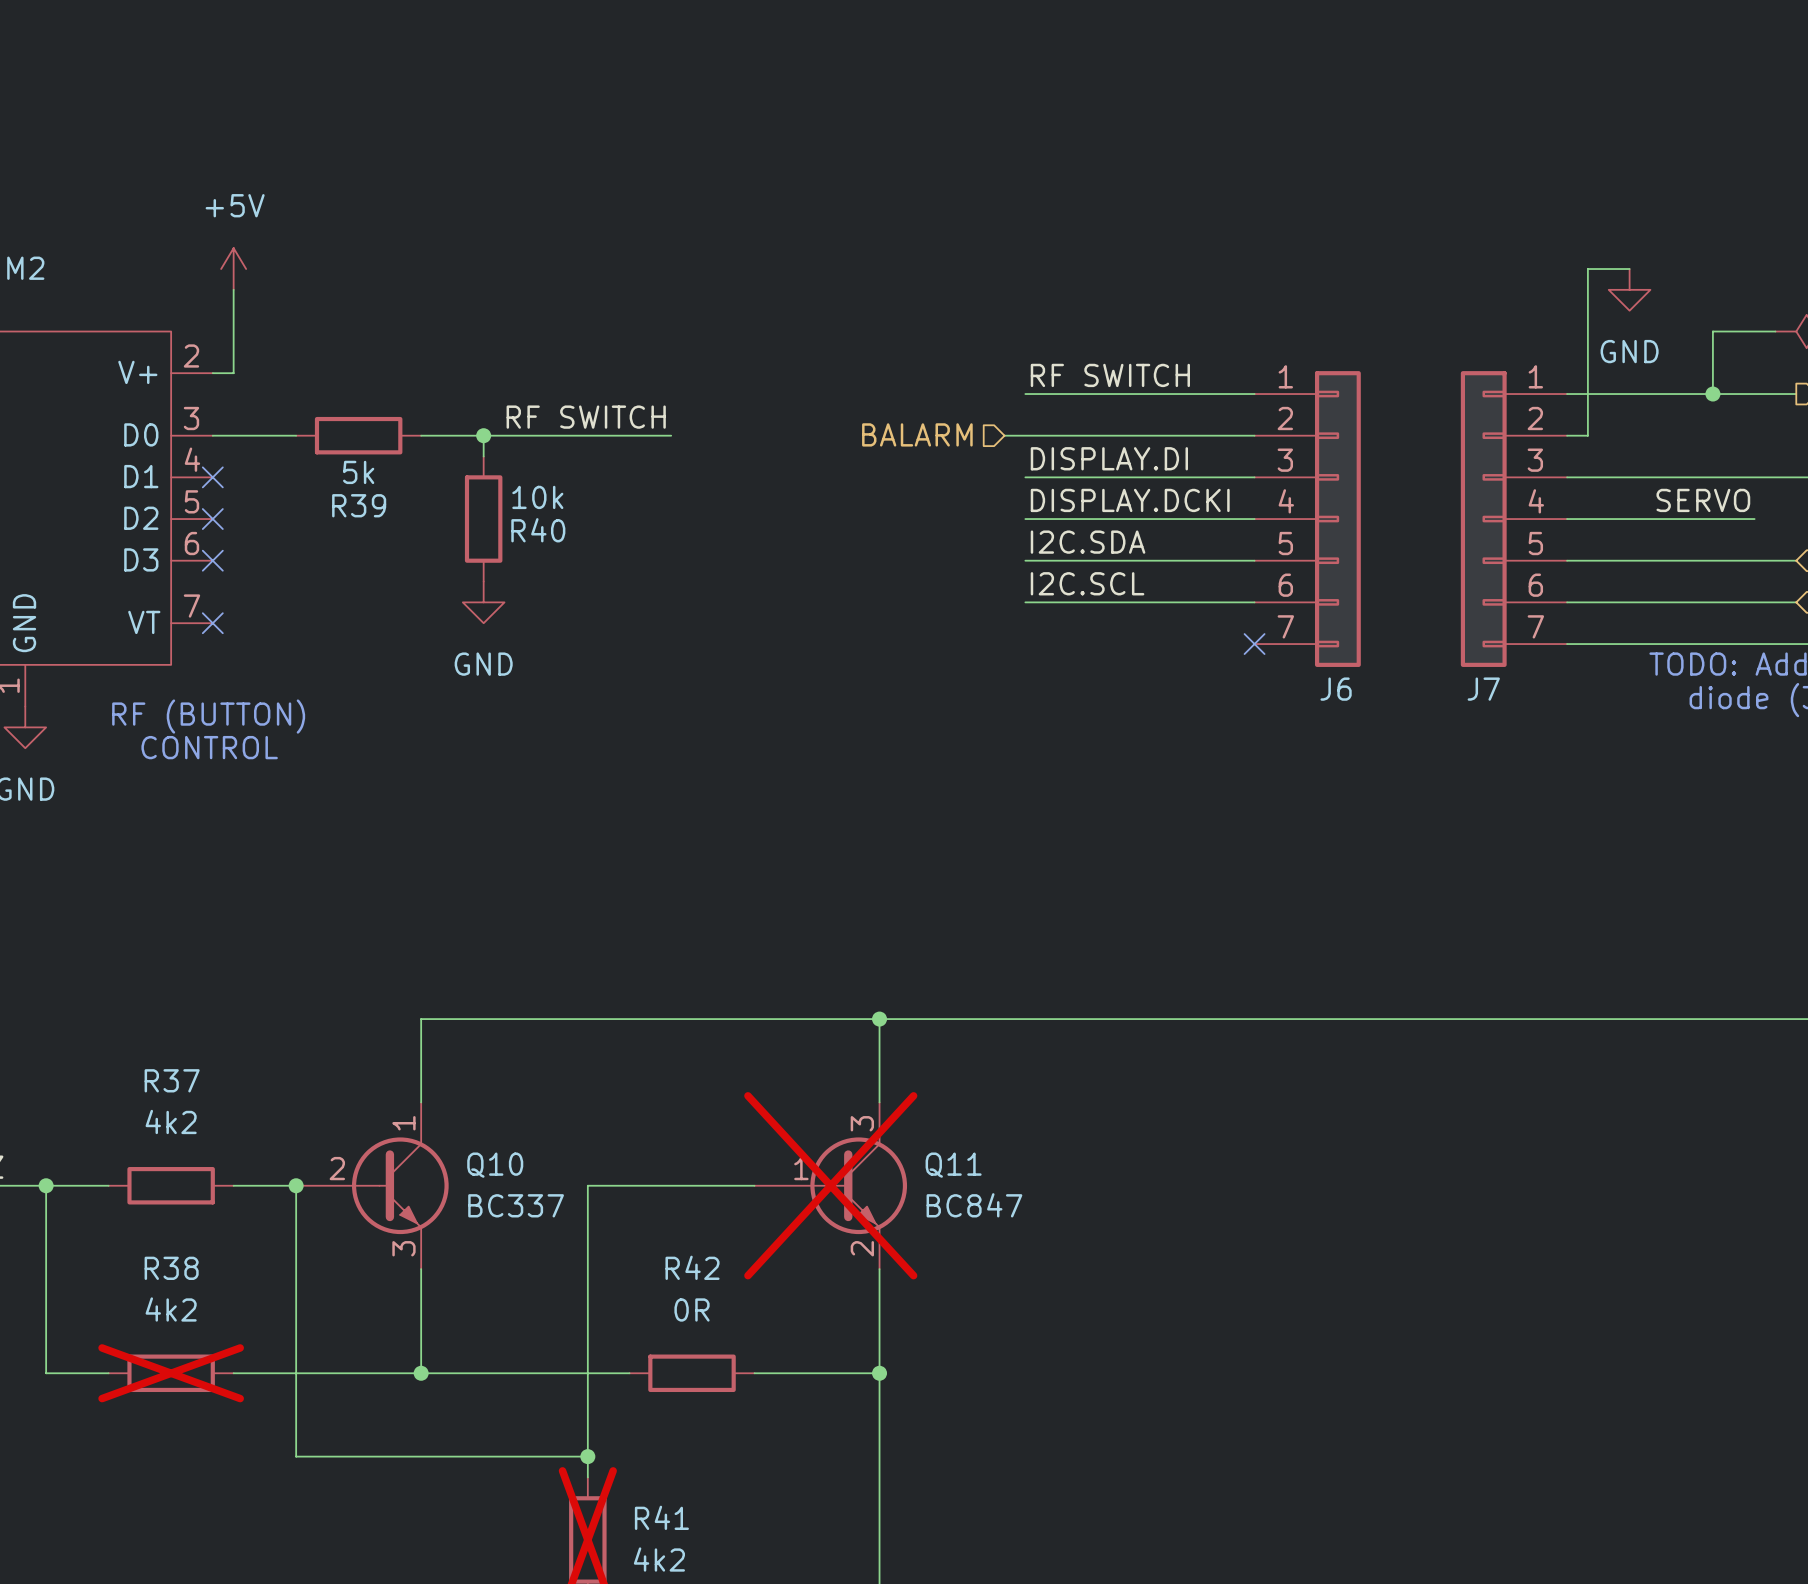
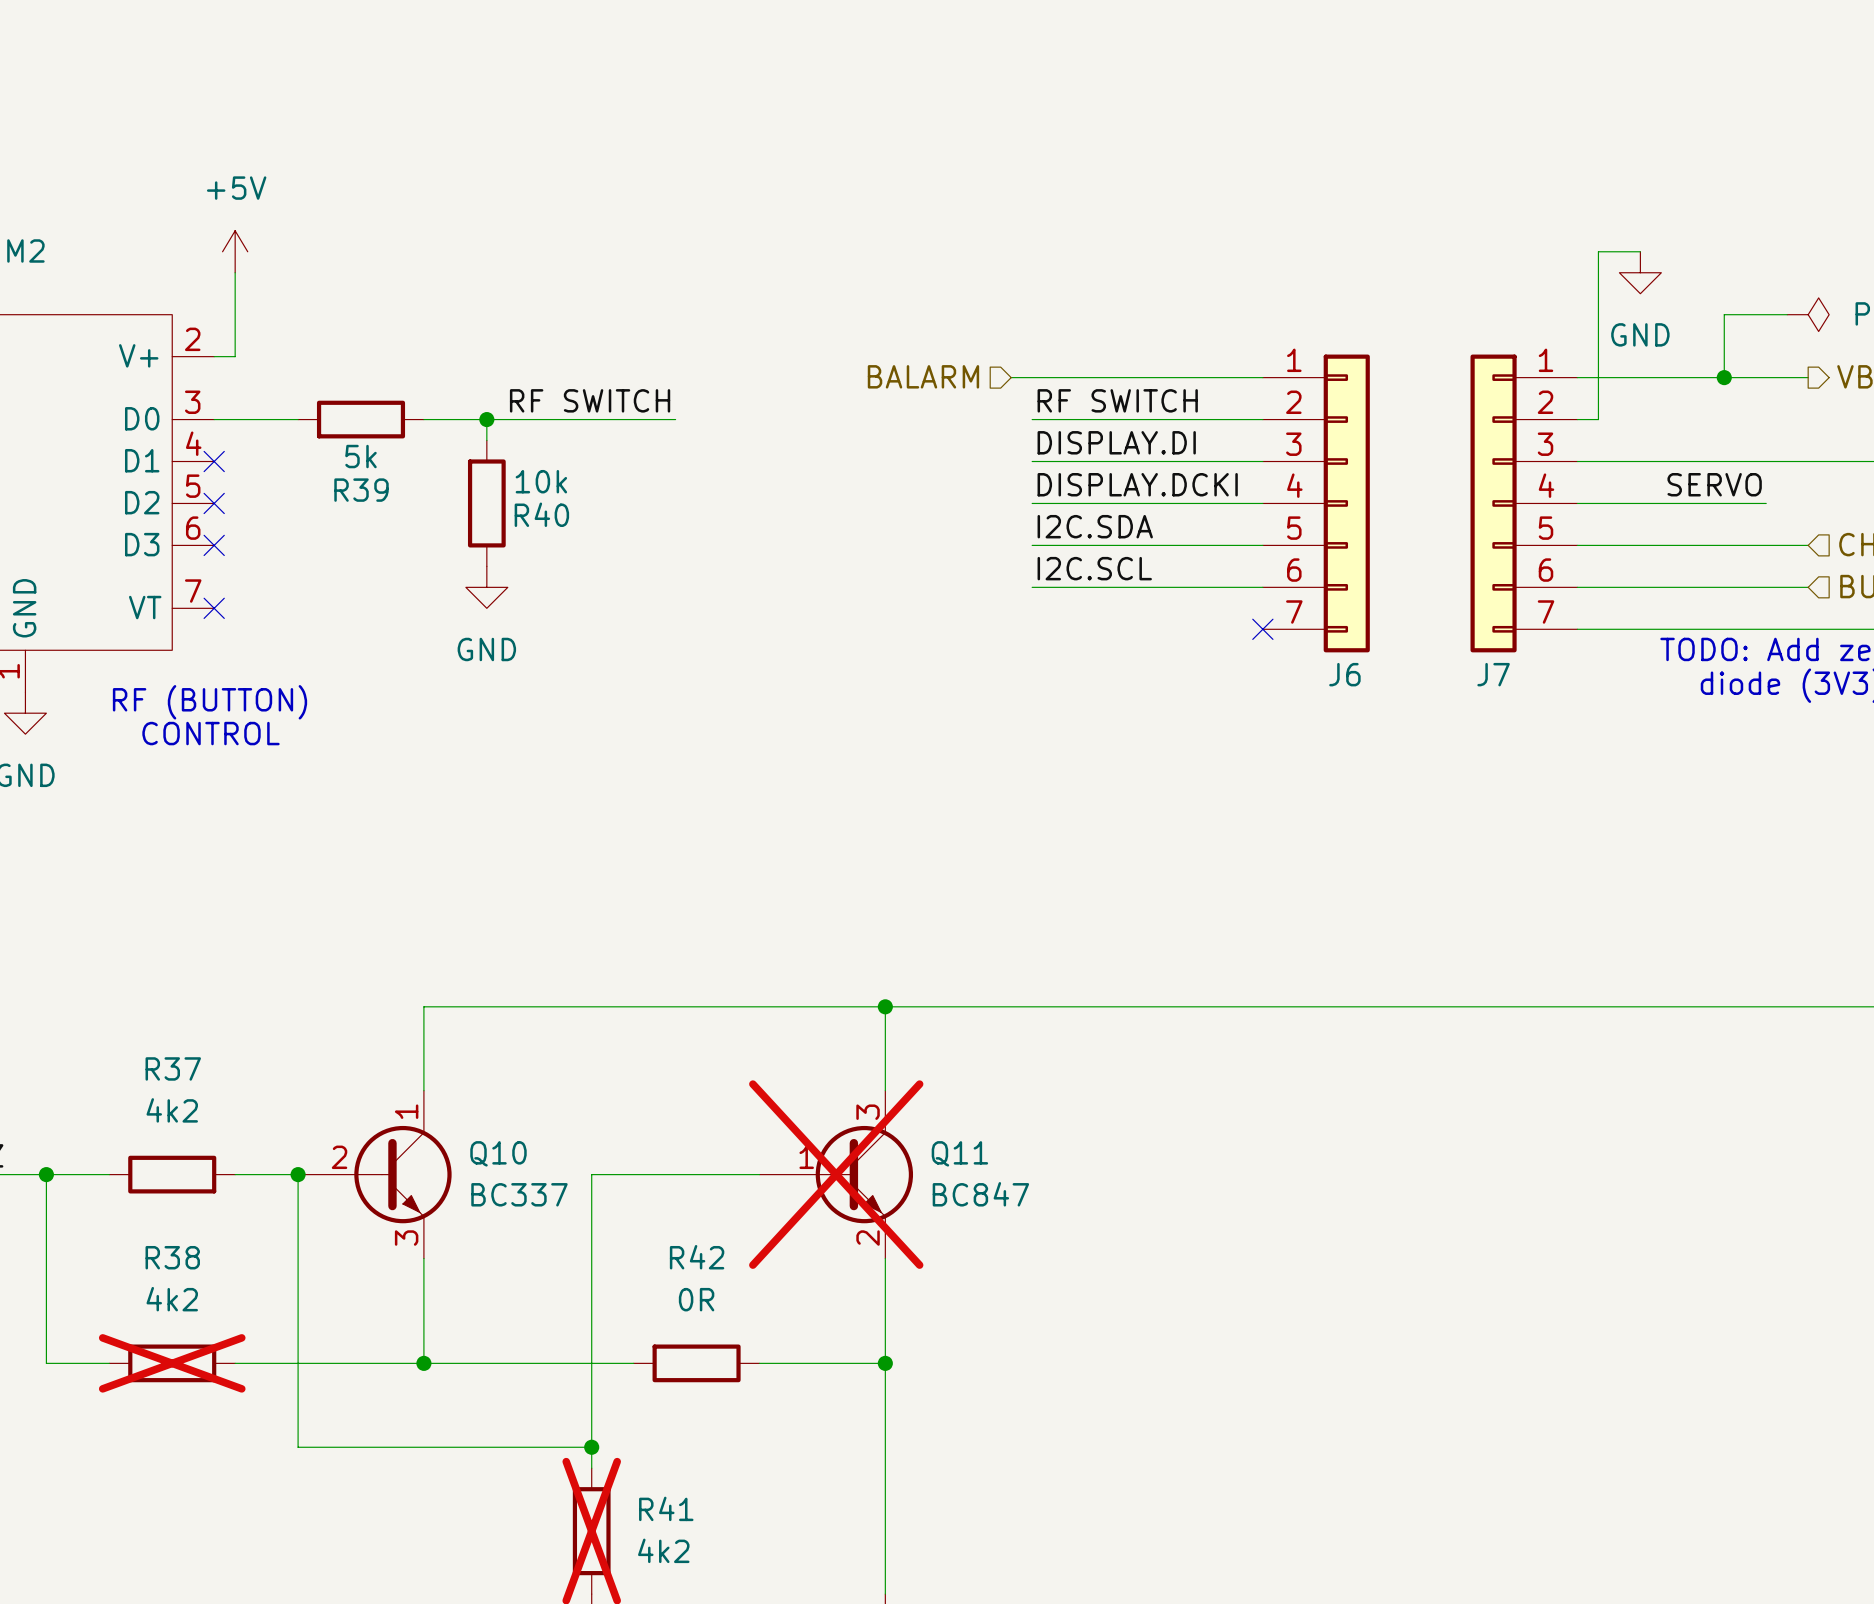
label position: RF SWITCH (1110, 375) -> RF SWITCH (1117, 400)
hierarchical label position: BALARM (917, 434) -> BALARM (923, 376)
wire: (1004, 435) (1025, 435) -> (1011, 377) (1032, 377)

